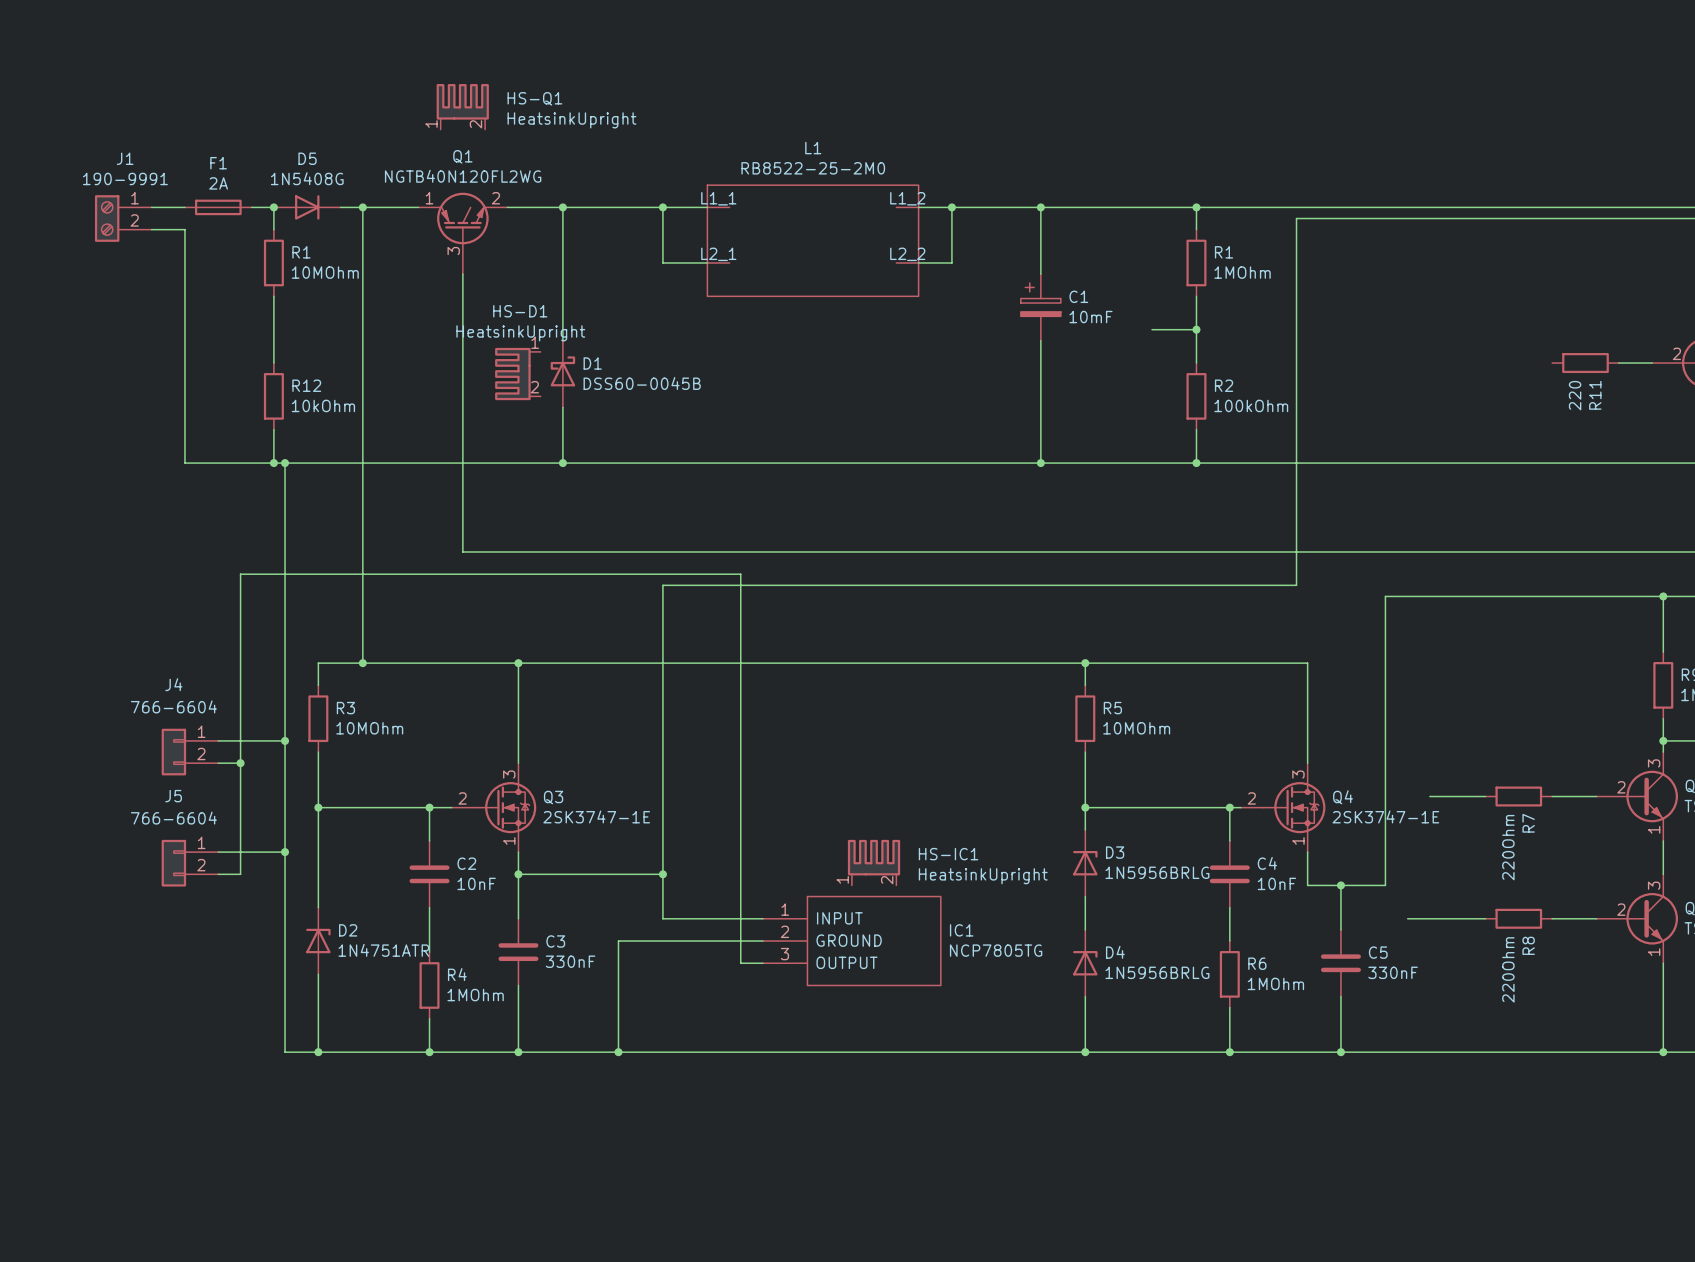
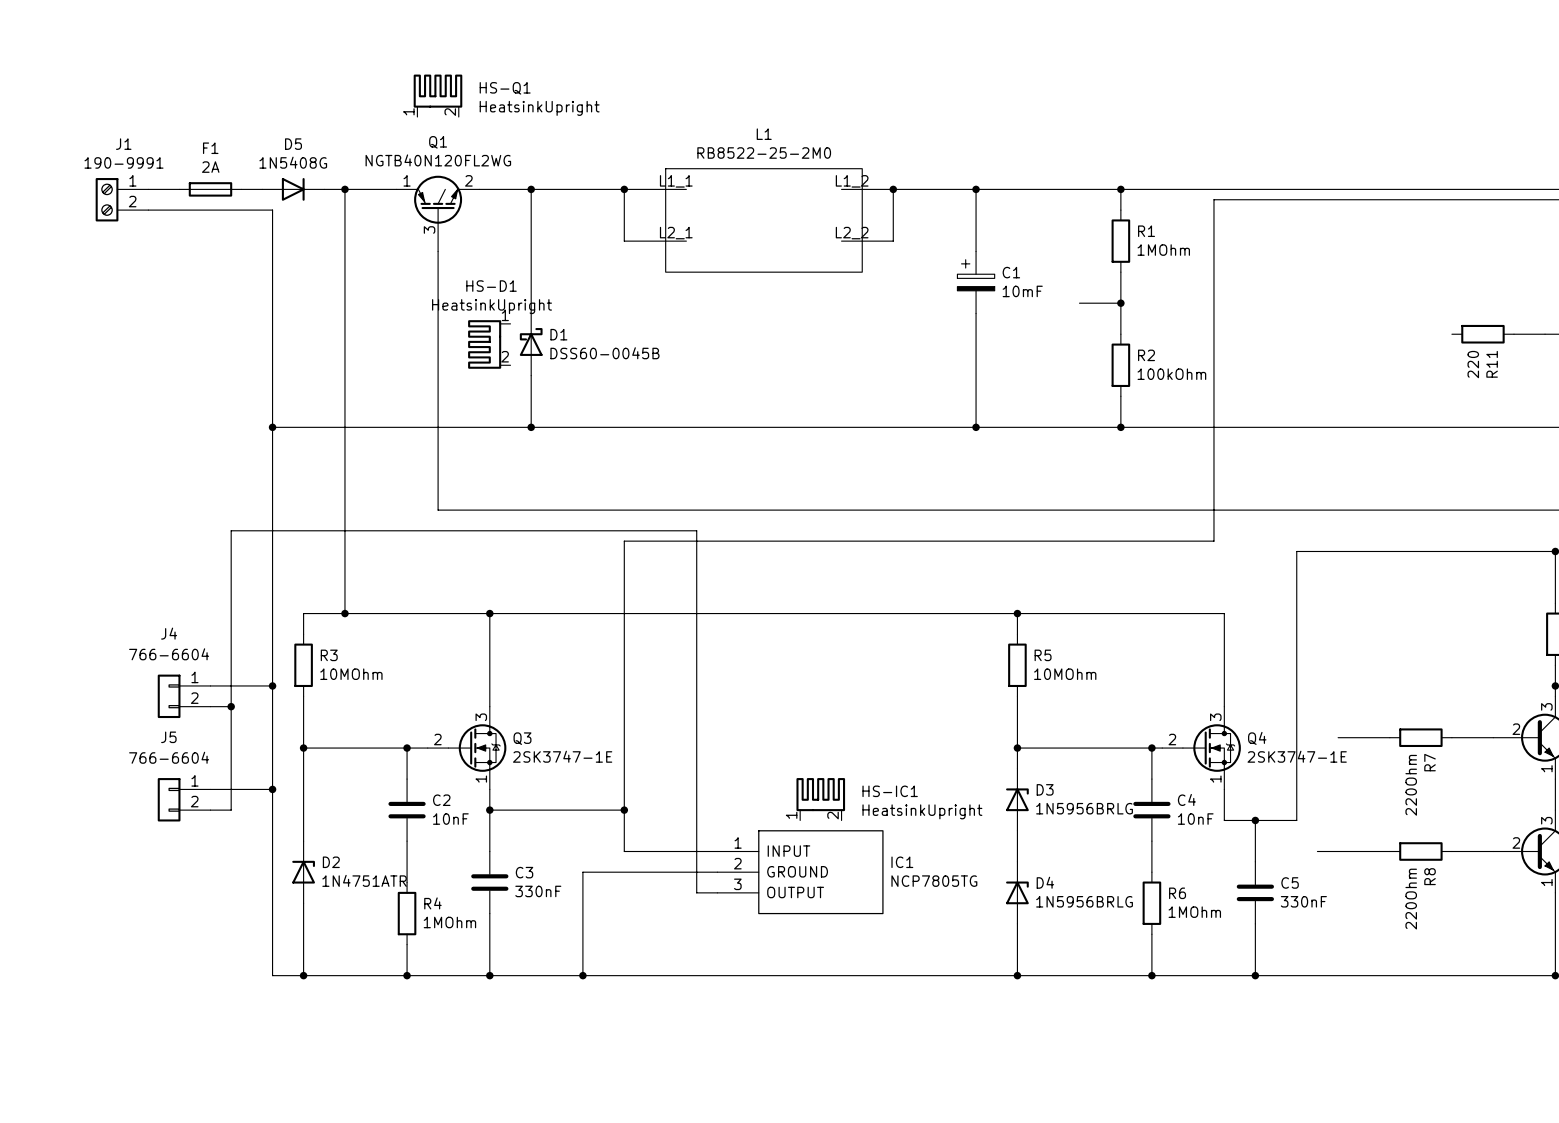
wire: (273, 207) (273, 229) -> none
junction: (273, 207) -> none
wire: (184, 229) (184, 463) (285, 463) -> (179, 210) (272, 210) (272, 427)
R1: 10MOhm (273, 262) -> none
wire: (273, 296) (273, 363) -> none
R12: 10kOhm (273, 396) -> none
wire: (273, 429) (273, 463) -> none
junction: (273, 463) -> none

